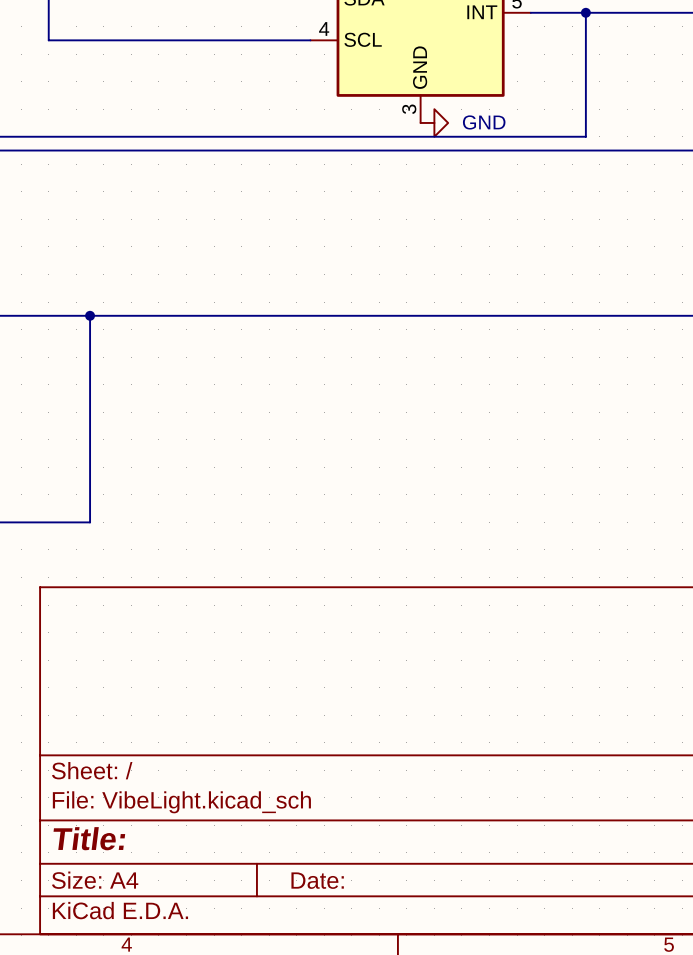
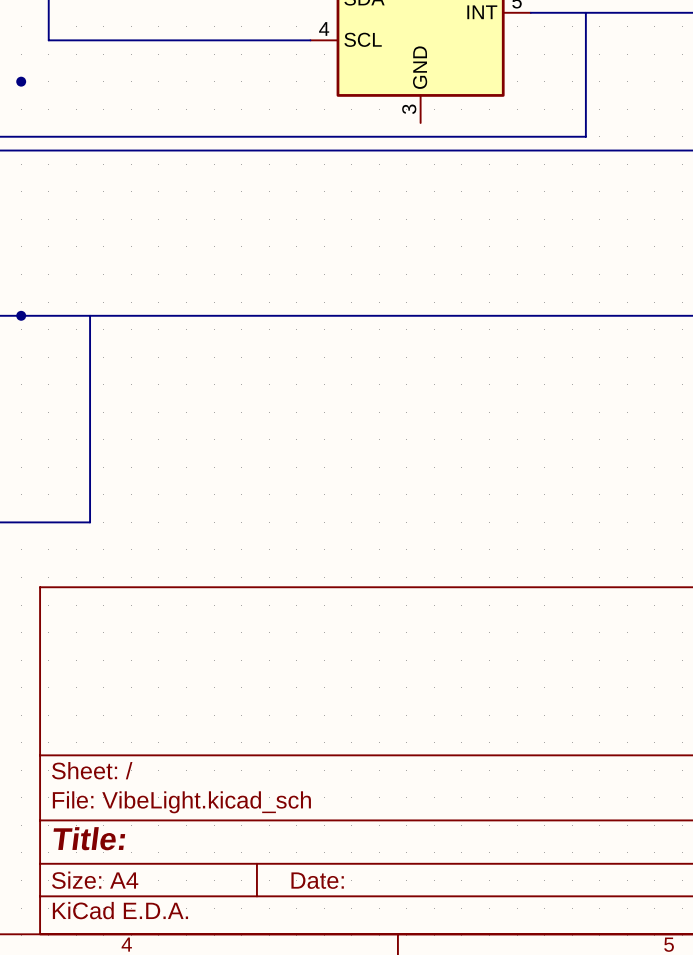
junction: (585, 12) -> none
junction: none -> (21, 81)
power symbol: GND (434, 122) -> none
junction: none -> (21, 315)
junction: (90, 315) -> none

